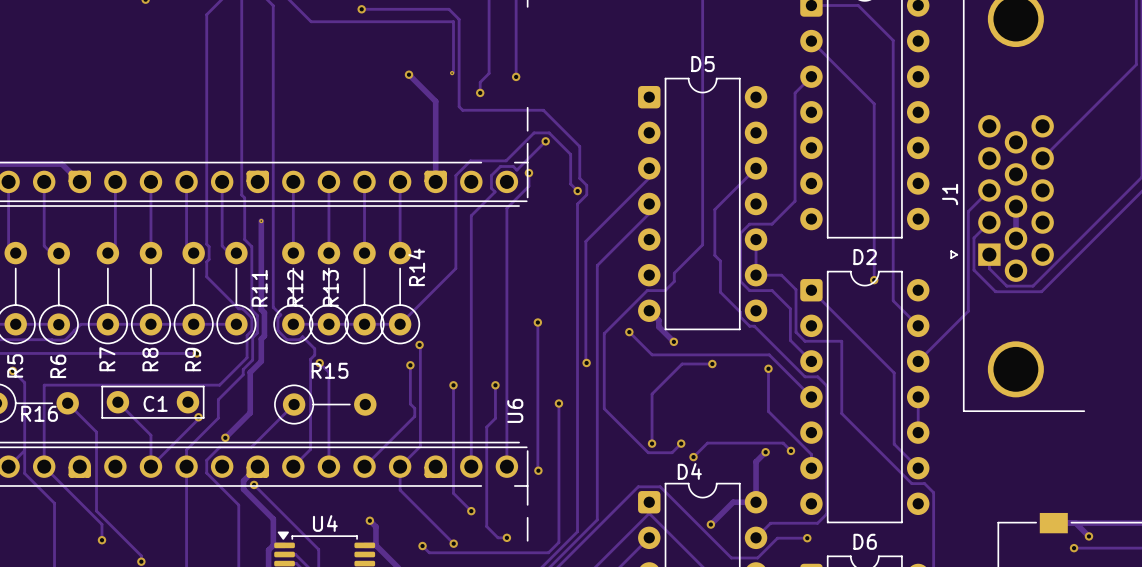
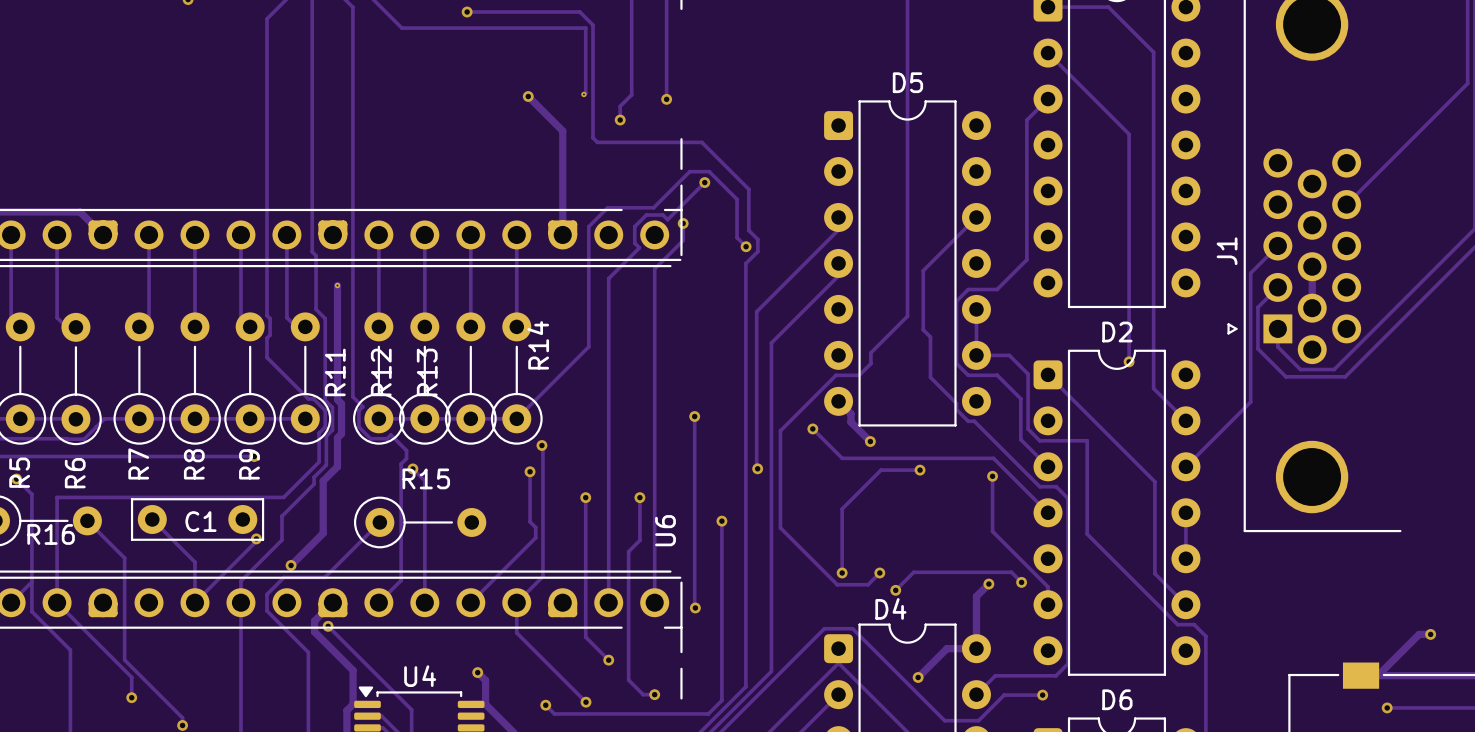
track: none -> (1430, 634) (1419, 634) (1377, 675)
track: (1075, 523) (1088, 536) -> none
via position: (1088, 536) -> (1430, 634)

